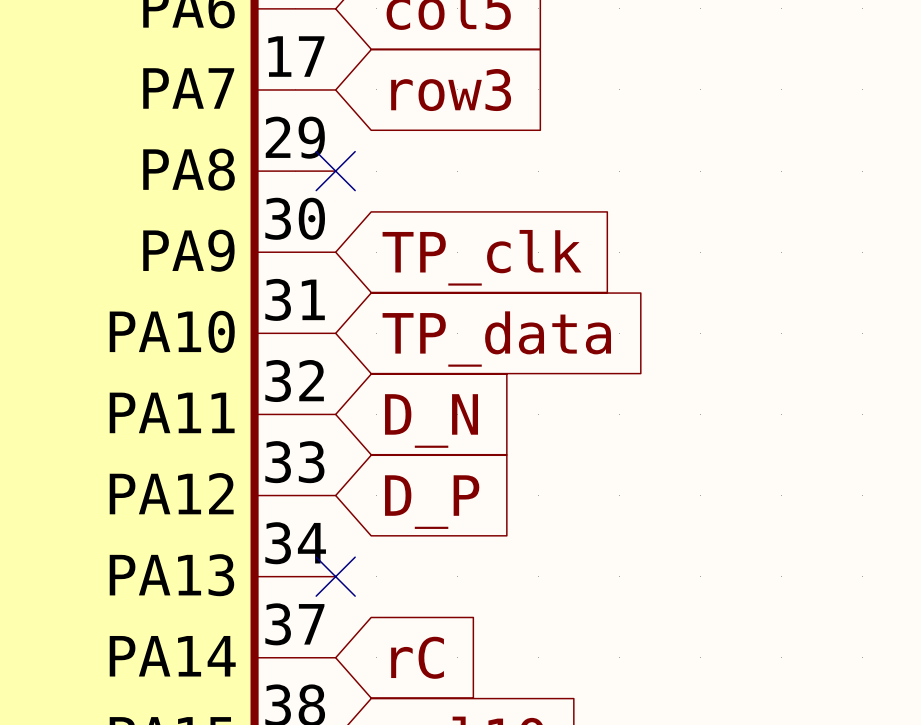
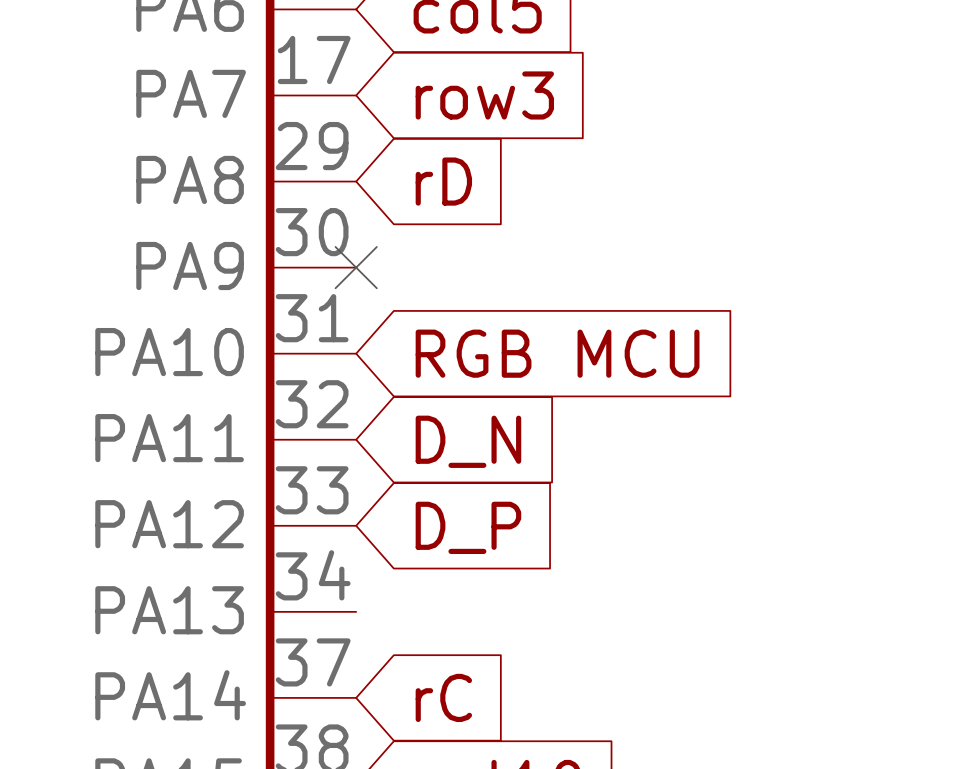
no-connect mark position: (335, 171) -> (356, 267)
global label: none -> rD (443, 181)
global label: TP_clk (482, 257) -> none
global label: TP_data (496, 339) -> RGB MCU (557, 353)
no-connect mark: (335, 576) -> none

